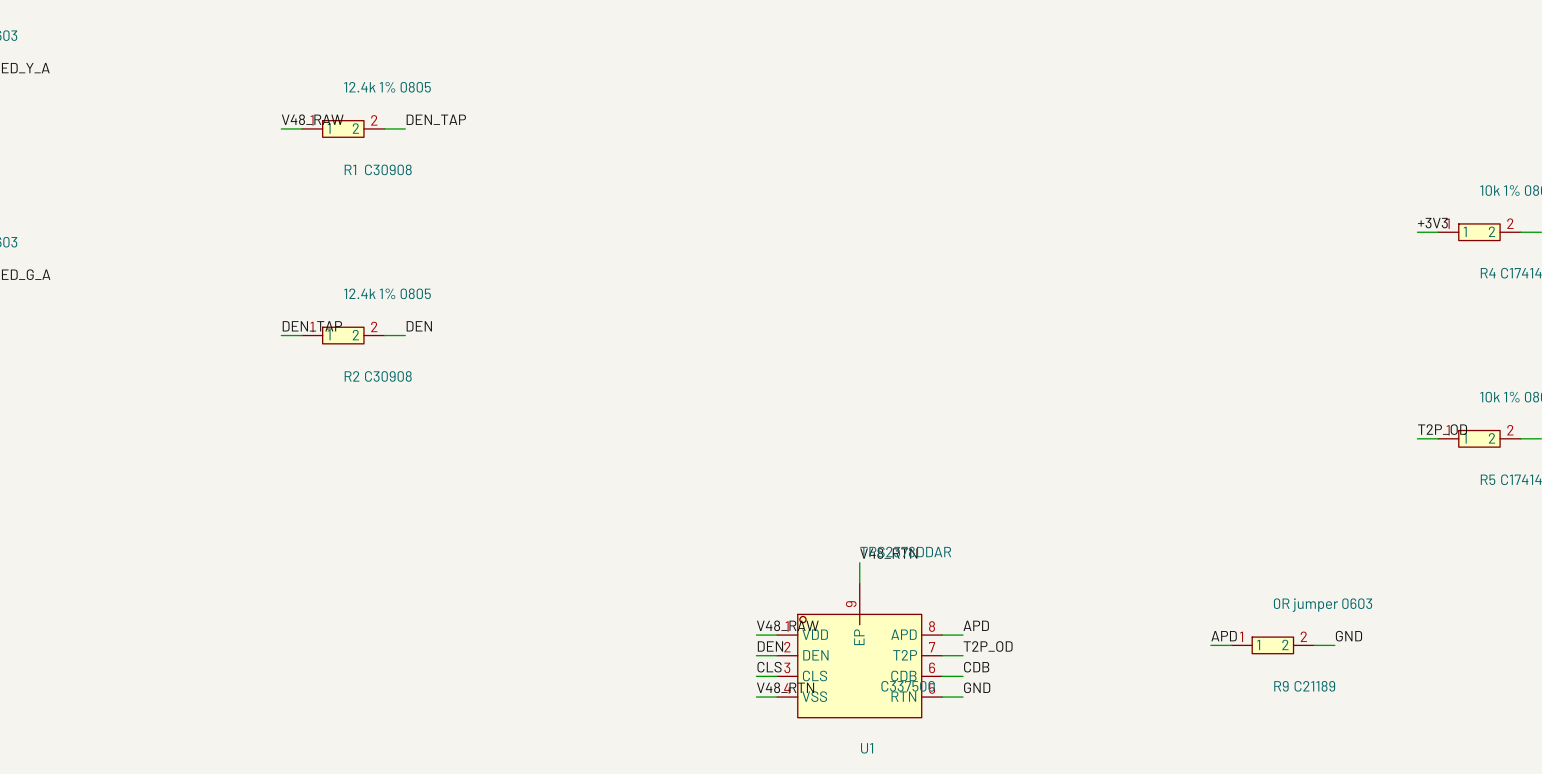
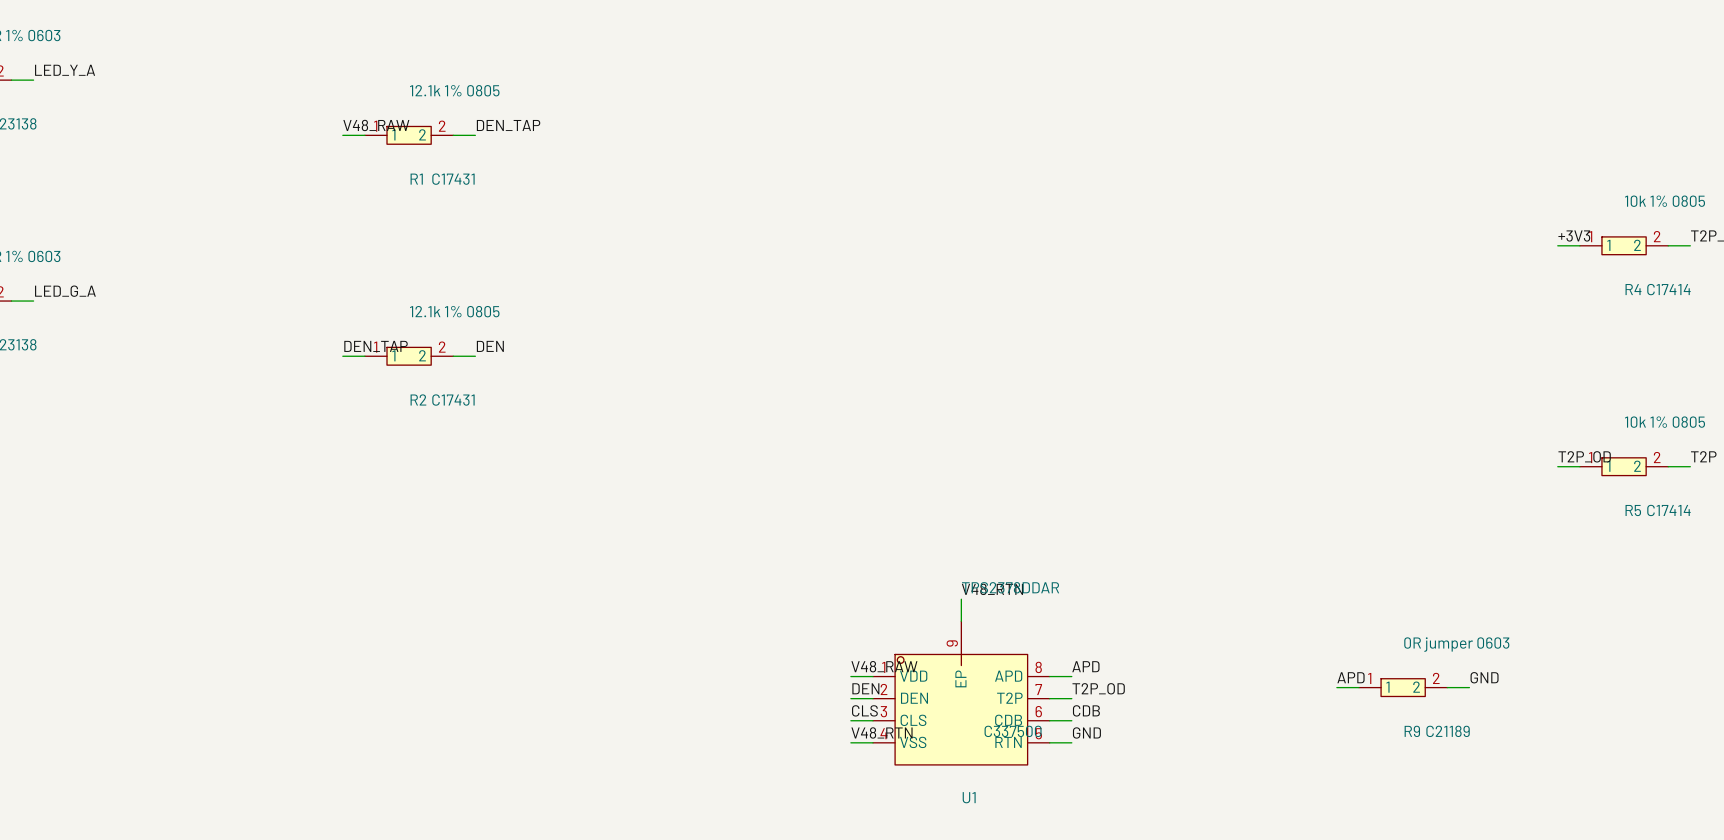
R1 value: 12.4k 1% 0805 (387, 87) -> 12.1k 1% 0805 (454, 90)
R1 text: C30908 (388, 169) -> C17431 (453, 179)
R2 value: 12.4k 1% 0805 (387, 293) -> 12.1k 1% 0805 (454, 311)
R2 text: C30908 (388, 376) -> C17431 (453, 400)

